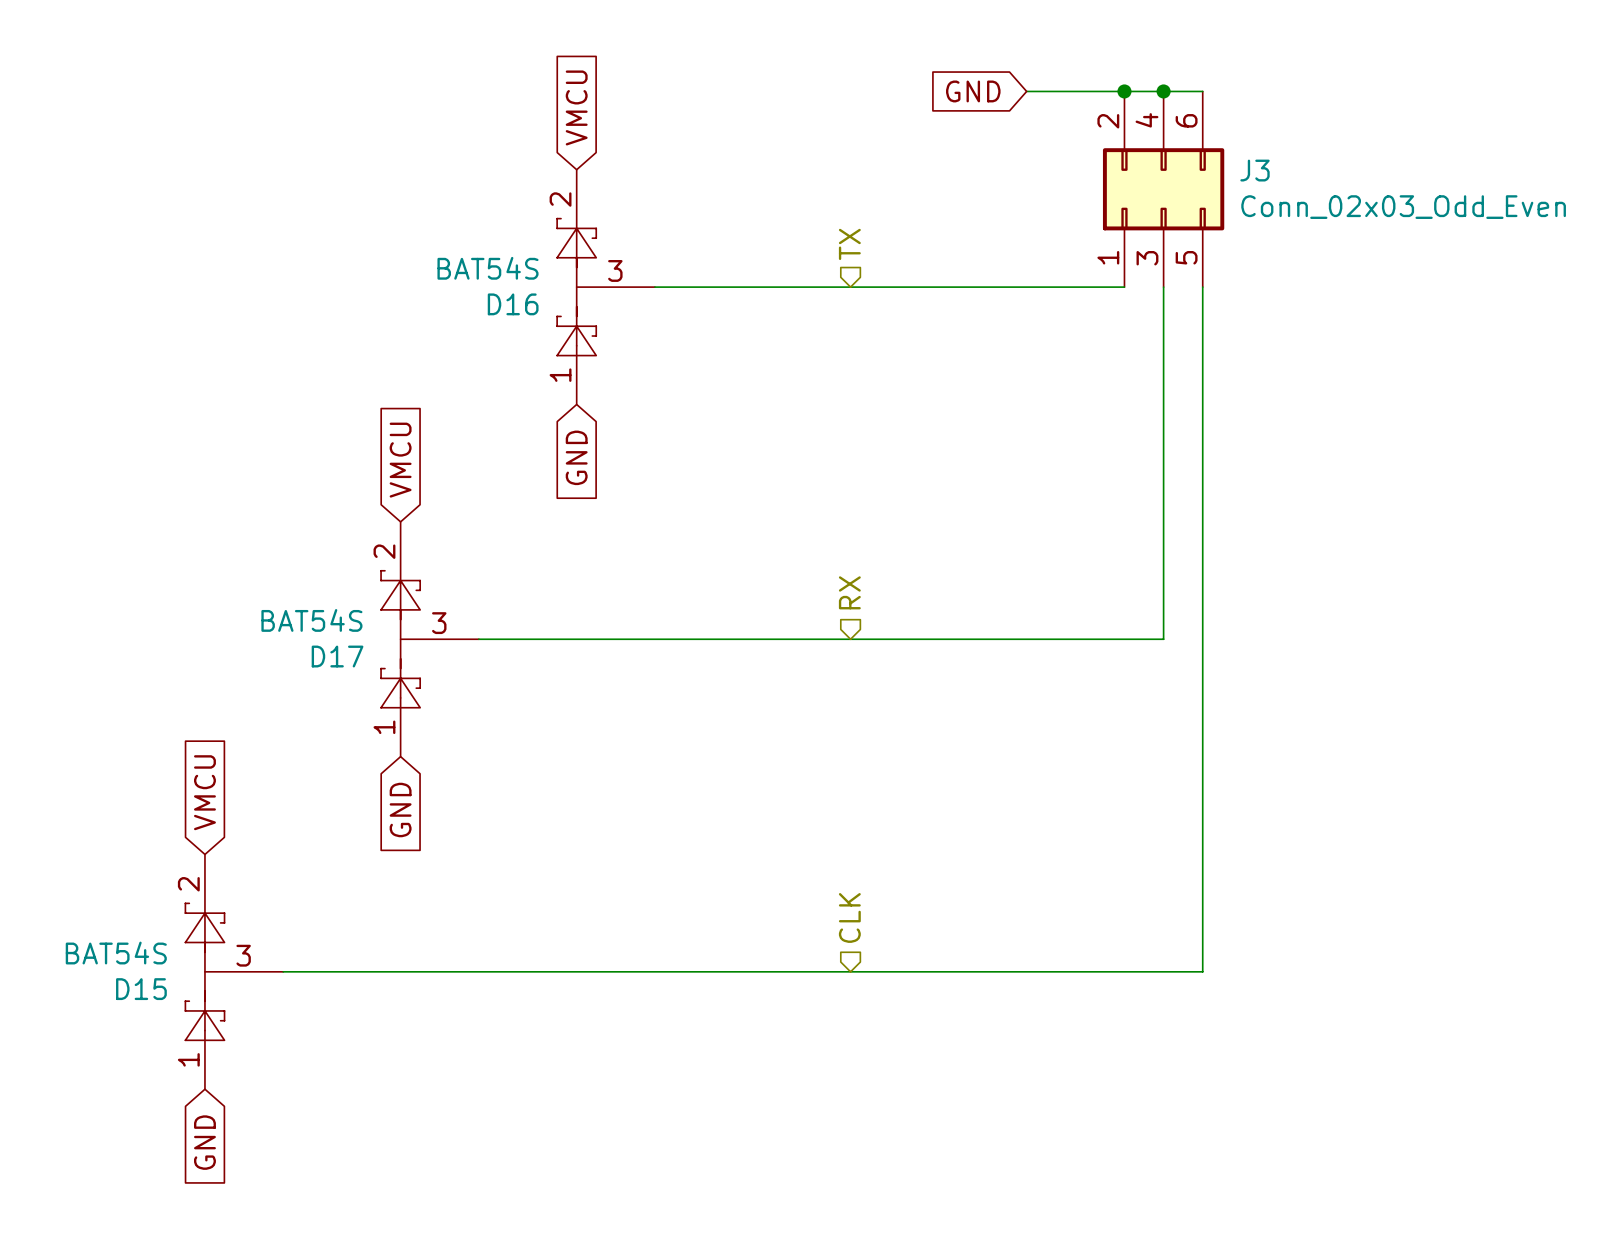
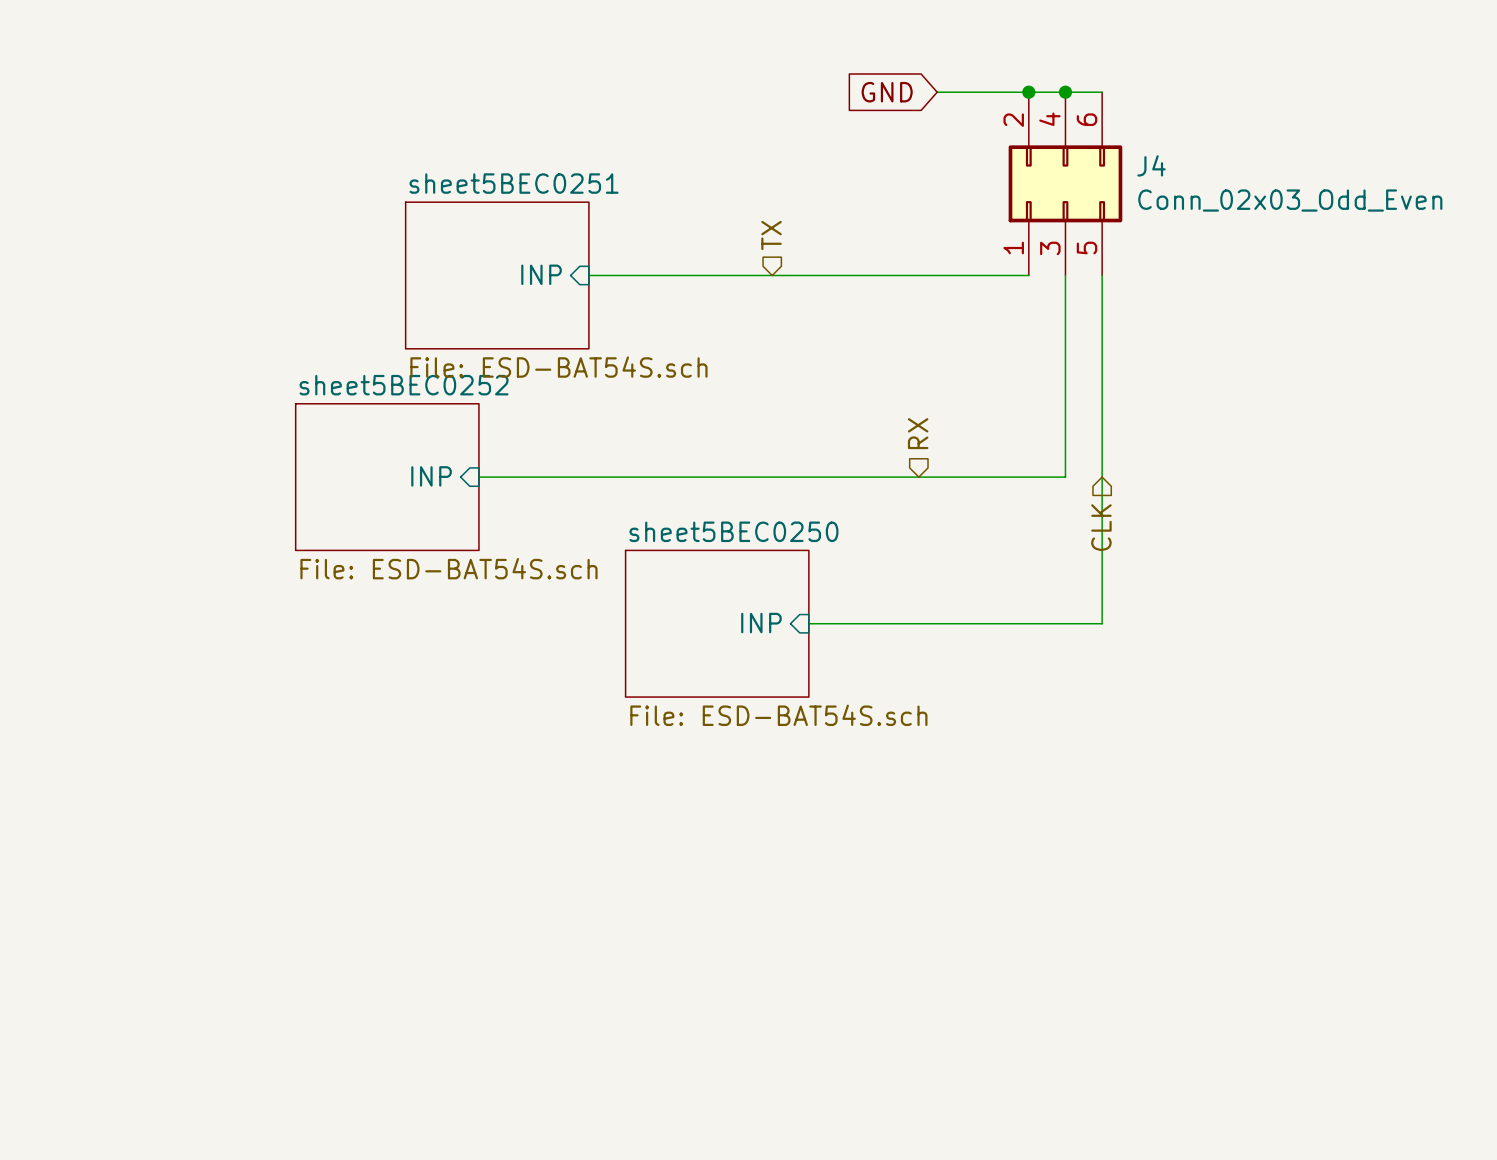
global label: VMCU (576, 107) -> none
J3 name: J3 (1255, 170) -> J4 (1151, 165)
sheet pin: none -> INP (541, 274)
sheet sheet5BEC0251: none -> File: ESD-BAT54S.sch (497, 275)
D16: BAT54S (606, 287) -> none
global label: GND (576, 457) -> none
global label: VMCU (400, 460) -> none
sheet pin: none -> INP (431, 476)
sheet sheet5BEC0252: none -> File: ESD-BAT54S.sch (387, 477)
wire: (1163, 502) (1163, 639) (478, 639) -> (1065, 477) (478, 477)
hierarchical label: none -> CLK (1101, 527)
hierarchical label position: RX (849, 592) -> RX (918, 433)
D17: BAT54S (429, 639) -> none
sheet sheet5BEC0250: none -> File: ESD-BAT54S.sch (717, 623)
sheet pin: none -> INP (761, 623)
wire: (1202, 658) (1202, 971) (283, 971) -> (1102, 623) (808, 623)
global label: VMCU (204, 792) -> none
global label: GND (400, 810) -> none
hierarchical label: CLK (849, 917) -> none
D15: BAT54S (234, 971) -> none
global label: GND (204, 1142) -> none

